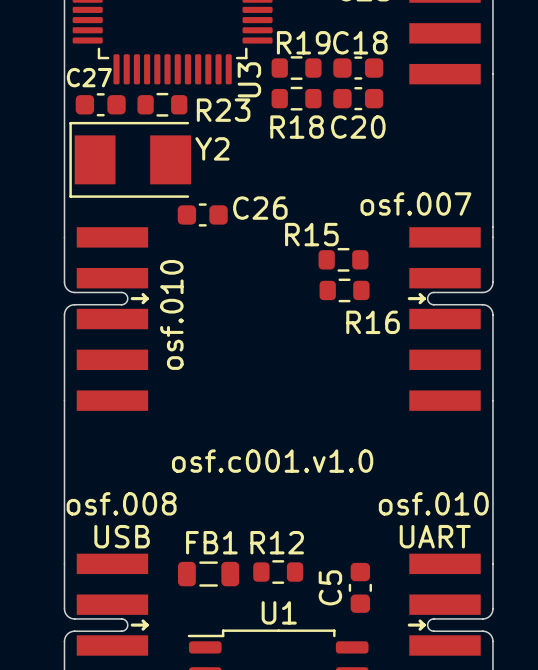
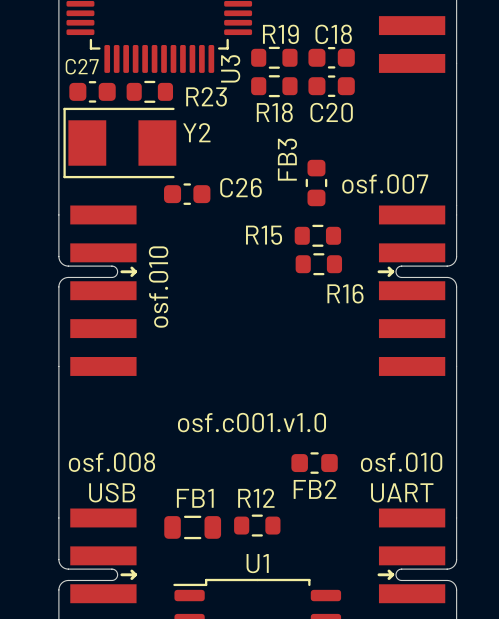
FB3: none -> (316, 183)
R15 name position: R15 (311, 234) -> R15 (264, 235)
FB2: none -> (314, 463)
C5: (360, 587) -> none

